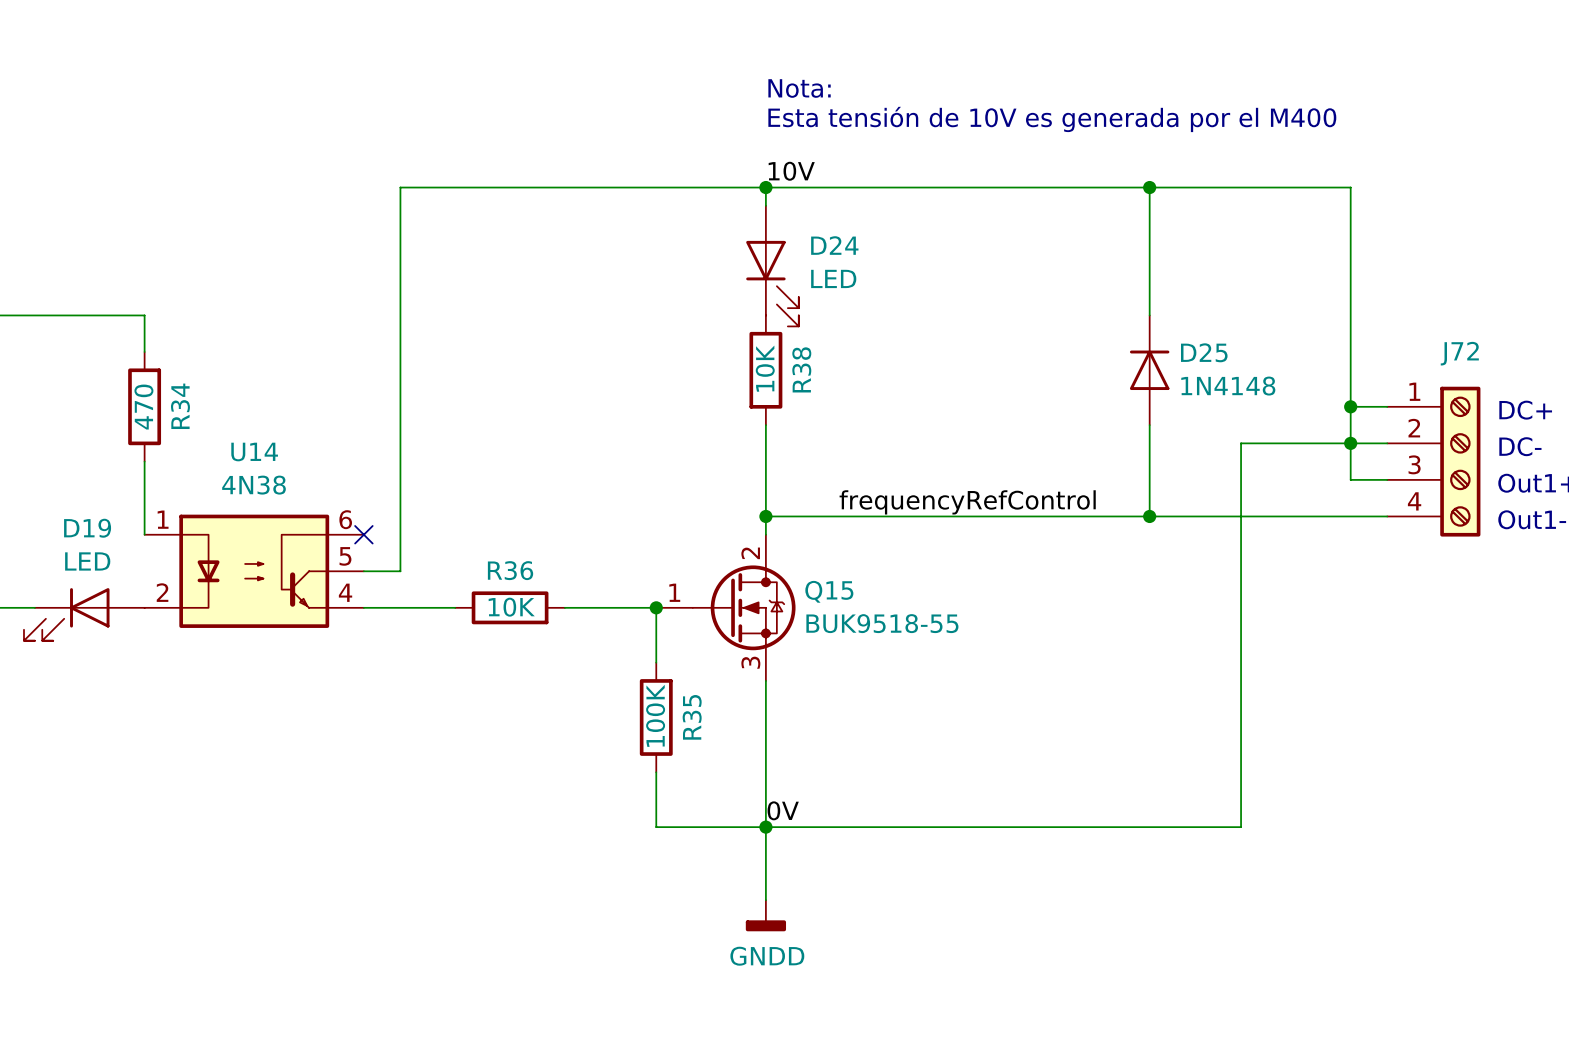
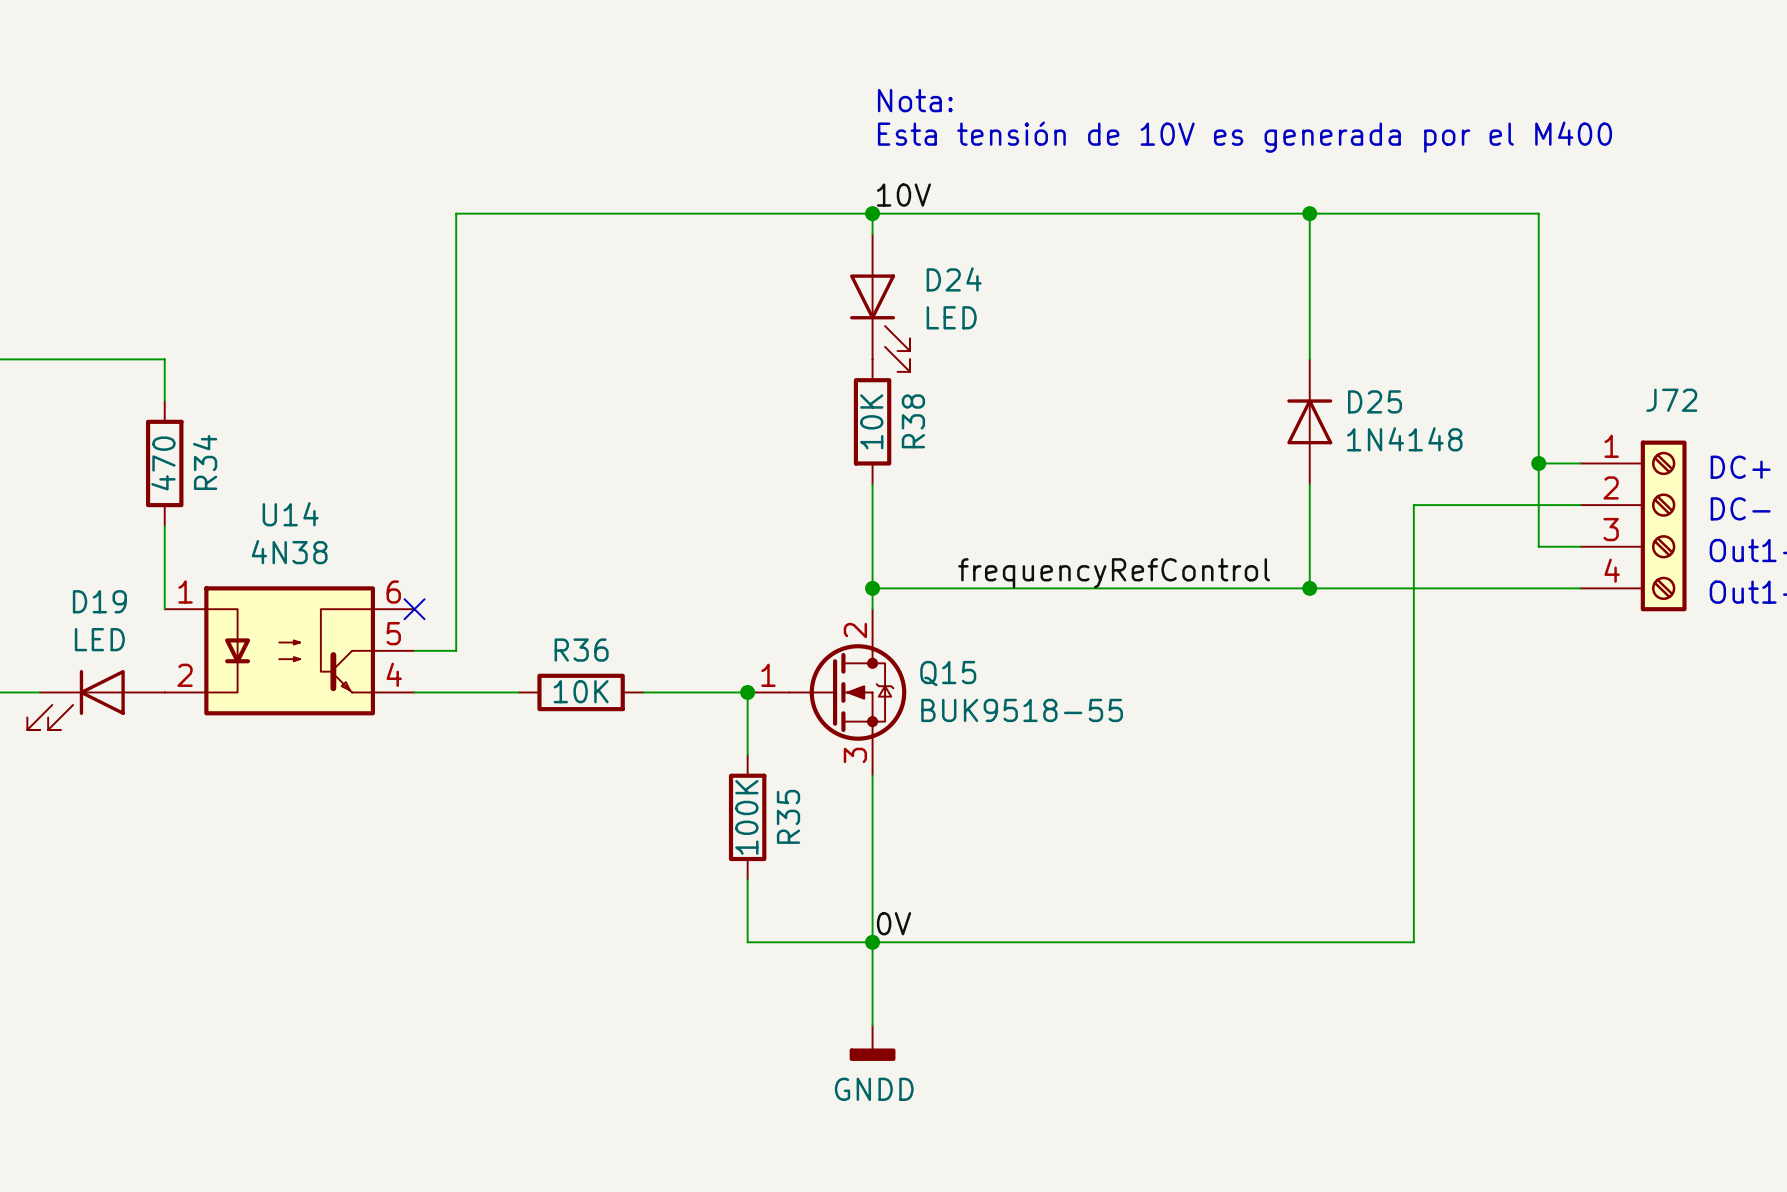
junction: (1350, 443) -> none

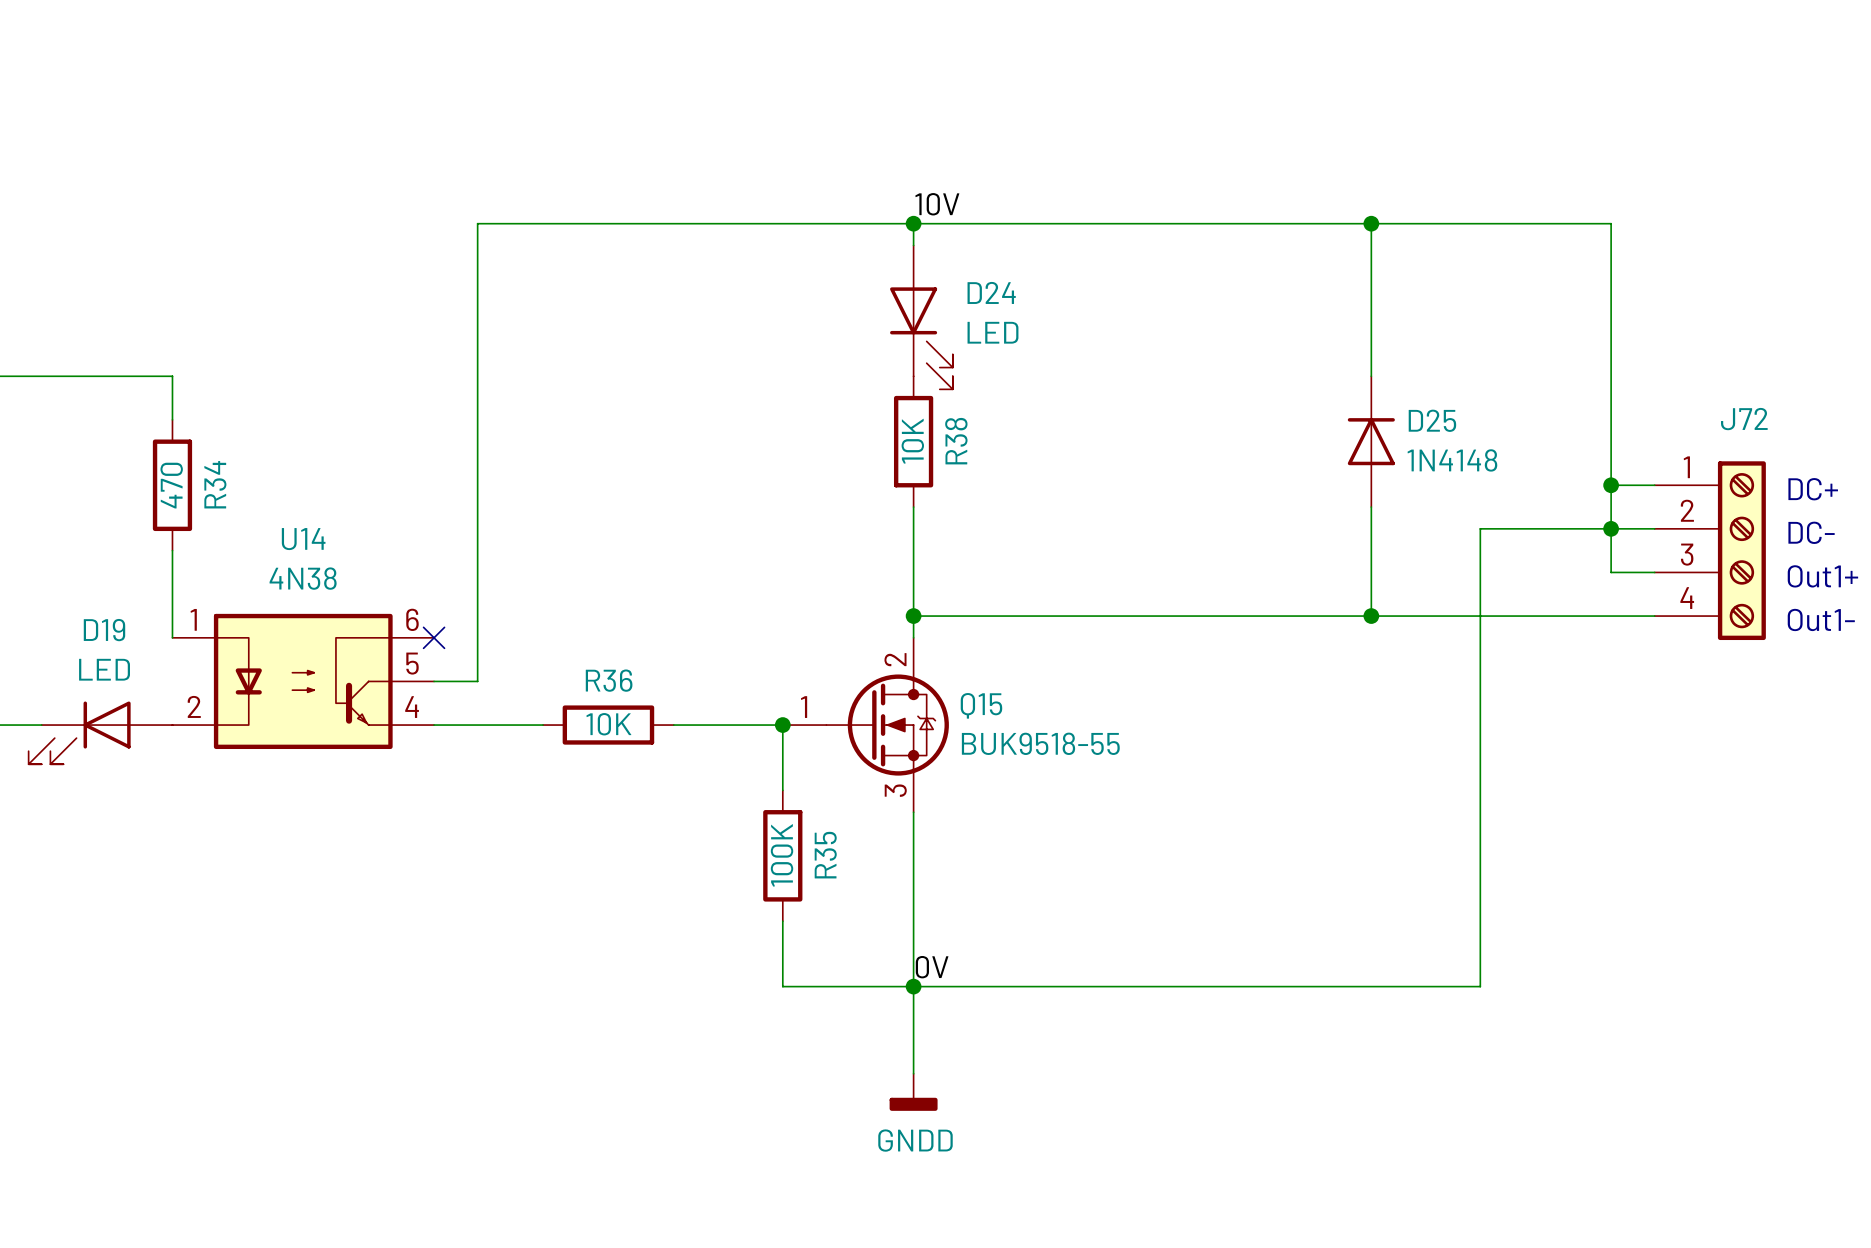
text: Nota: (915, 100) -> none
text: Esta tensión de 10V es generada por el M400 (1244, 137) -> none
junction: none -> (1611, 528)
label: frequencyRefControl (1114, 573) -> none

